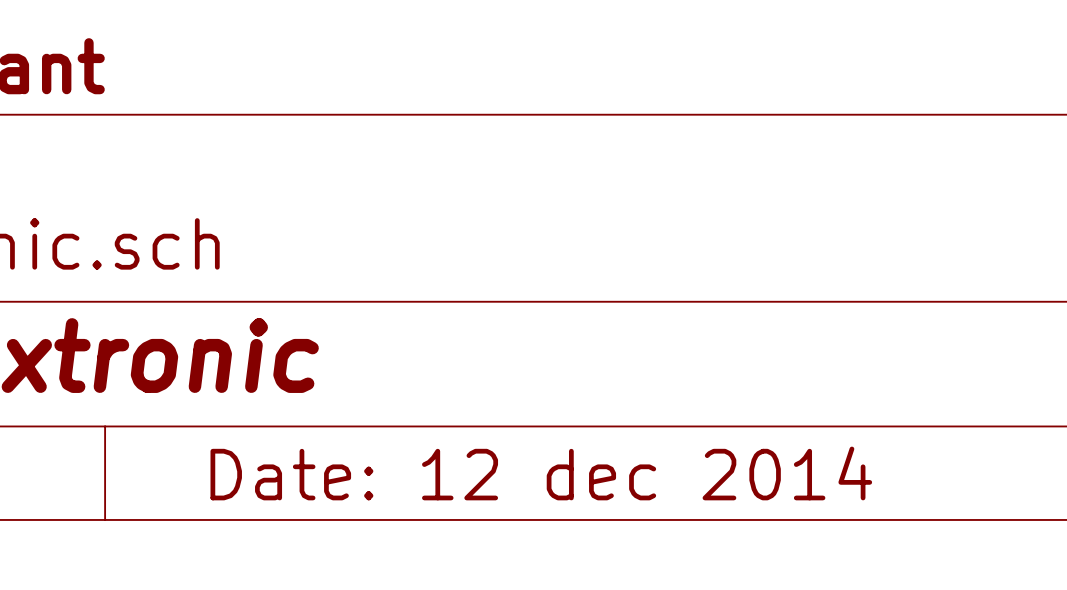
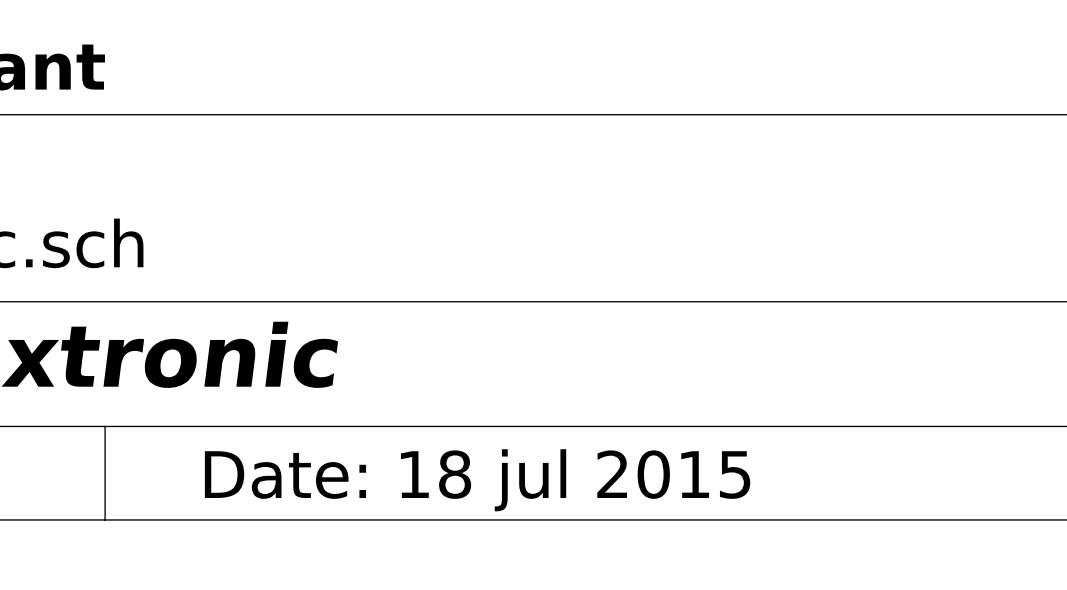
title block: Date: 12 dec 2014 (541, 473) -> Date: 18 jul 2015 (477, 480)

